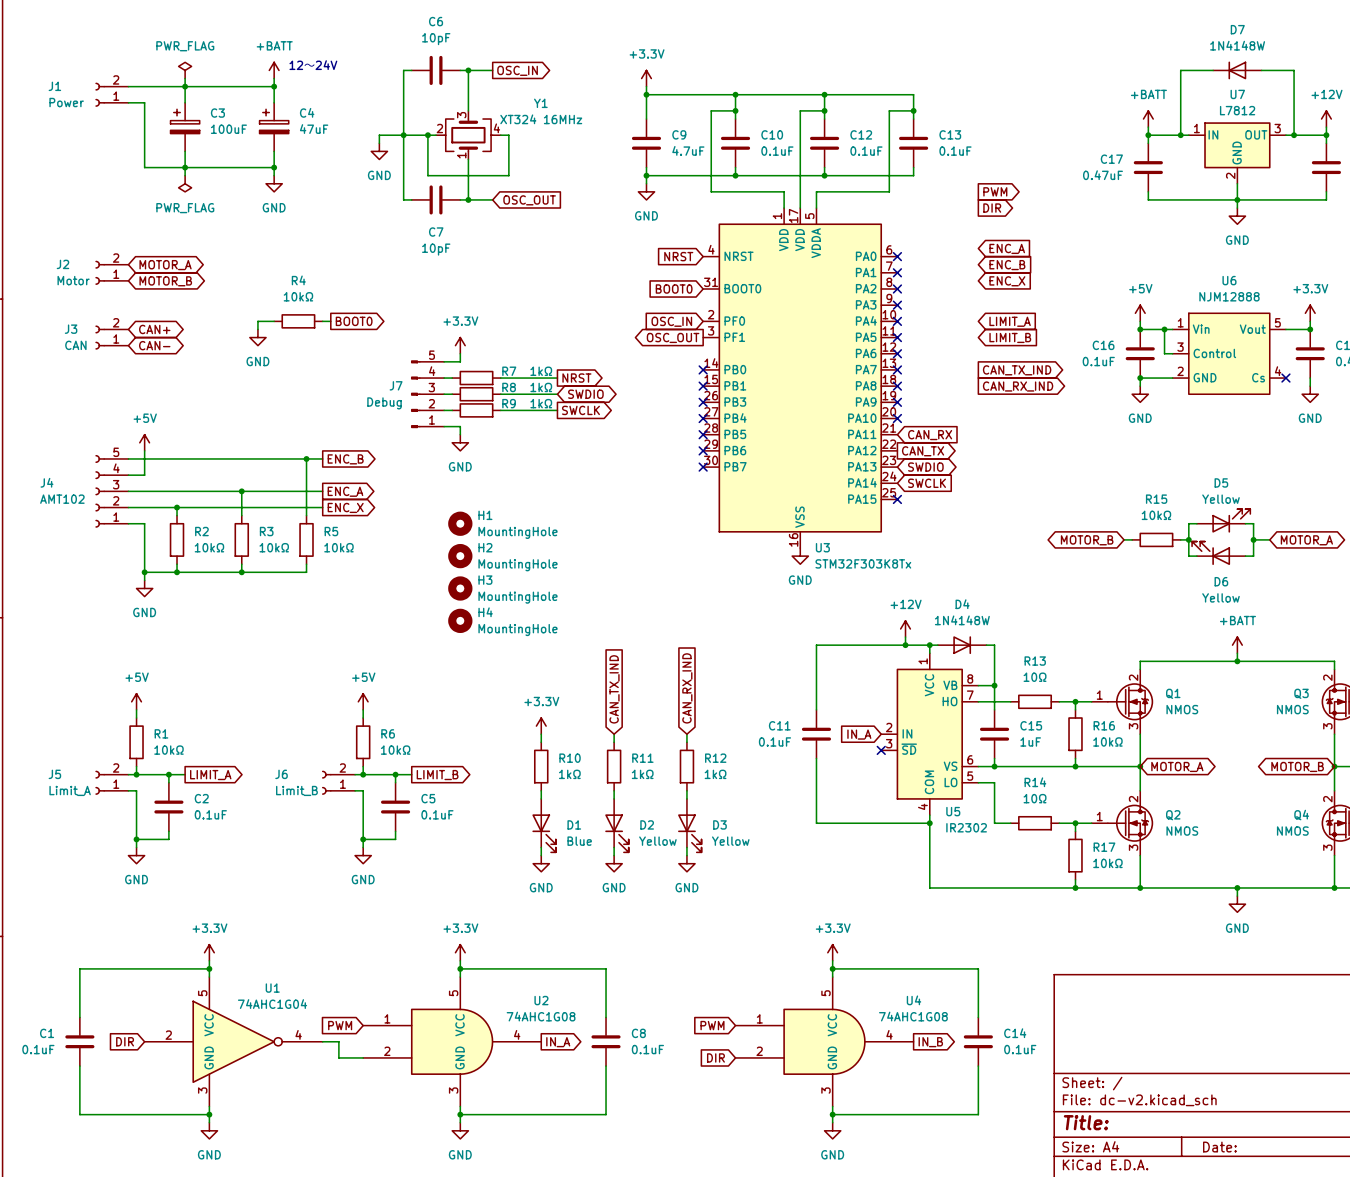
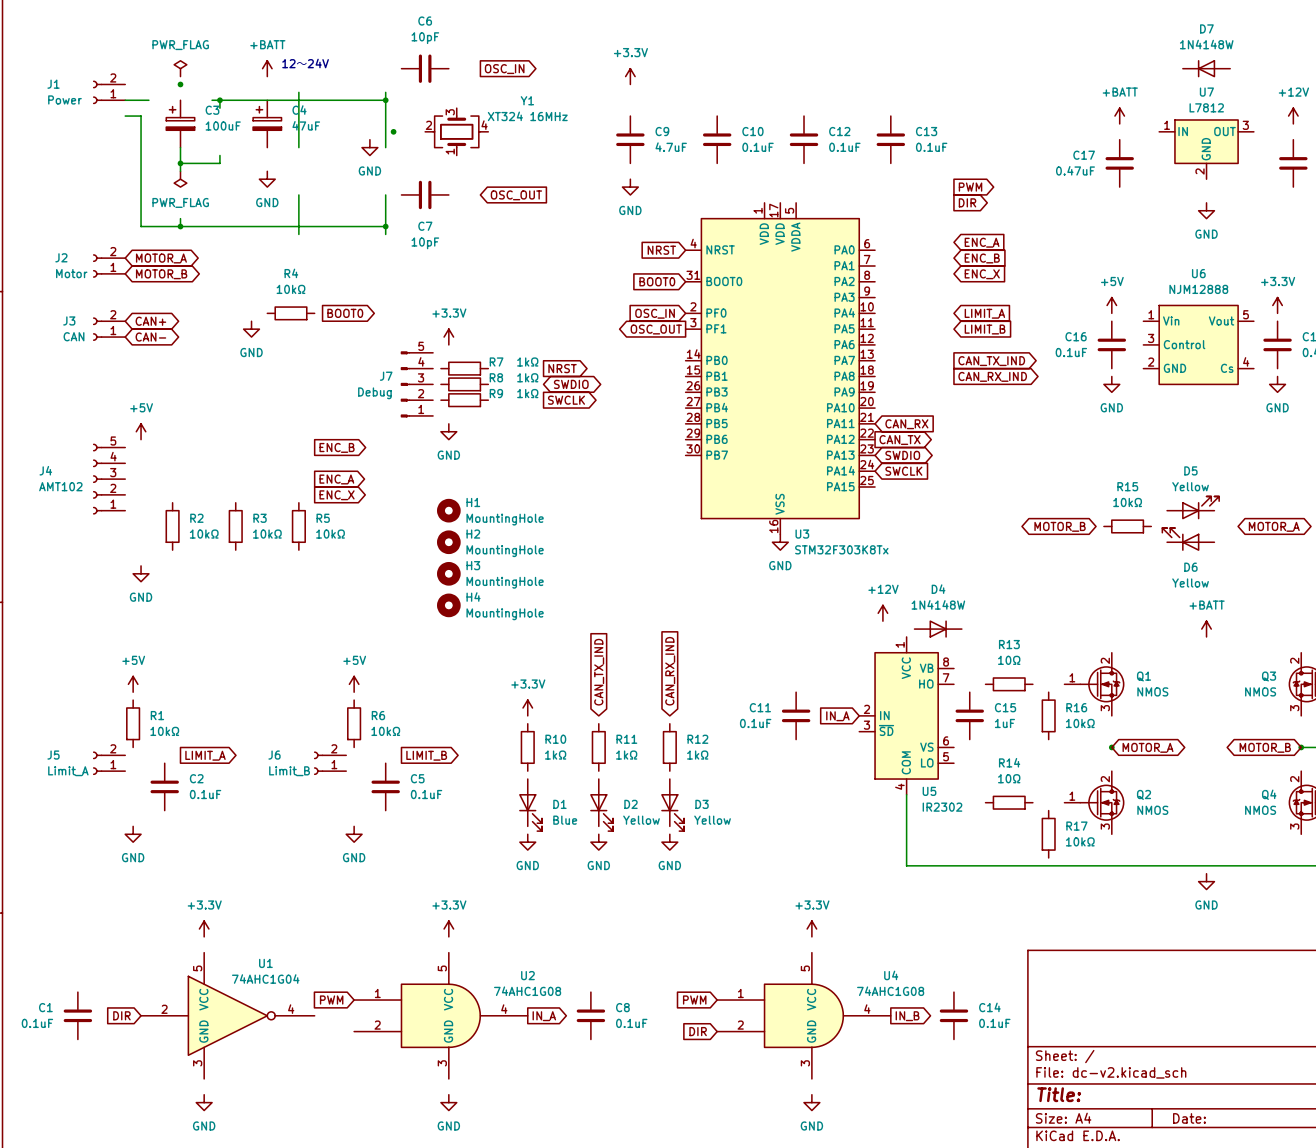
wire: (411, 70) (403, 70) (403, 199) (411, 199) -> none
wire: (460, 70) (492, 70) -> none
wire: (468, 70) (468, 110) -> none
junction: (468, 70) -> none
wire: (1213, 70) (1180, 70) (1180, 135) -> none
wire: (1261, 70) (1294, 70) (1294, 135) -> none
wire: (185, 78) (185, 102) -> none
wire: (274, 78) (274, 102) -> none
wire: (128, 86) (274, 86) -> none
junction: (274, 86) -> none
wire: (646, 86) (646, 119) -> none
wire: none -> (298, 92) (298, 147)
wire: none -> (385, 92) (385, 147)
wire: (646, 94) (913, 94) (913, 119) -> none
junction: (646, 94) -> none
wire: (735, 94) (735, 119) -> none
junction: (735, 94) -> none
wire: (824, 94) (824, 119) -> none
junction: (824, 94) -> none
wire: (144, 102) (144, 119) -> (141, 100) (148, 100)
wire: none -> (212, 100) (385, 100)
wire: none -> (219, 100) (219, 108)
junction: none -> (219, 100)
junction: none -> (385, 100)
wire: (735, 110) (711, 110) (711, 191) (784, 191) (784, 208) -> none
junction: (735, 110) -> none
wire: (824, 110) (800, 110) (800, 208) -> none
junction: (824, 110) -> none
wire: (913, 110) (889, 110) (889, 191) (816, 191) (816, 208) -> none
junction: (913, 110) -> none
wire: none -> (125, 116) (141, 116)
wire: (1148, 127) (1148, 143) -> none
wire: (1326, 127) (1326, 143) -> none
wire: (427, 135) (427, 175) (508, 175) (508, 135) (500, 135) -> none
junction: (427, 135) -> none
wire: (436, 135) (379, 135) (379, 143) -> none
wire: (1148, 135) (1188, 135) -> none
junction: (1148, 135) -> none
junction: (1180, 135) -> none
wire: (1285, 135) (1326, 135) -> none
junction: (1294, 135) -> none
junction: (1326, 135) -> none
wire: (274, 151) (274, 175) -> none
wire: (468, 159) (468, 199) -> (385, 194) (385, 234)
wire: (144, 167) (185, 167) -> (141, 163) (141, 226) (385, 226)
wire: (225, 167) (274, 167) -> (219, 163) (219, 155)
junction: (274, 167) -> none
wire: (646, 167) (646, 183) -> none
wire: (735, 167) (735, 175) -> none
wire: (824, 167) (824, 175) -> none
wire: (913, 167) (913, 175) (646, 175) -> none
junction: (646, 175) -> none
junction: (735, 175) -> none
junction: (824, 175) -> none
wire: (1237, 183) (1237, 208) -> none
wire: (1148, 191) (1148, 199) (1326, 199) (1326, 191) -> none
wire: none -> (298, 194) (298, 234)
wire: (460, 199) (492, 199) -> none
junction: (468, 199) -> none
junction: (1237, 199) -> none
wire: none -> (180, 218) (180, 226)
junction: none -> (180, 226)
junction: none -> (385, 226)
no-connect mark: (897, 256) -> none
no-connect mark: (897, 272) -> none
no-connect mark: (897, 289) -> none
no-connect mark: (897, 305) -> none
wire: (274, 321) (257, 321) (257, 329) -> none
wire: (322, 321) (330, 321) -> none
no-connect mark: (897, 321) -> none
wire: (1140, 321) (1140, 329) (1172, 329) -> none
wire: (1310, 321) (1310, 329) (1285, 329) -> none
junction: (1140, 329) -> none
wire: (1164, 329) (1164, 353) (1172, 353) -> none
junction: (1164, 329) -> none
junction: (1310, 329) -> none
no-connect mark: (897, 337) -> none
wire: (460, 353) (460, 361) (444, 361) -> none
no-connect mark: (897, 353) -> none
no-connect mark: (703, 369) -> none
no-connect mark: (897, 369) -> none
wire: (444, 378) (452, 378) -> none
wire: (500, 378) (557, 378) -> none
junction: (1140, 378) -> none
wire: (1172, 378) (1140, 378) (1140, 386) -> none
no-connect mark: (1285, 378) -> none
wire: (1310, 378) (1310, 386) -> none
no-connect mark: (703, 386) -> none
no-connect mark: (897, 386) -> none
wire: (444, 394) (452, 394) -> none
wire: (500, 394) (557, 394) -> none
no-connect mark: (703, 402) -> none
no-connect mark: (897, 402) -> none
wire: (444, 410) (452, 410) -> none
wire: (500, 410) (557, 410) -> none
no-connect mark: (703, 418) -> none
no-connect mark: (897, 418) -> none
wire: (444, 426) (460, 426) (460, 434) -> none
no-connect mark: (703, 434) -> none
wire: (144, 450) (144, 475) (128, 475) -> none
no-connect mark: (703, 450) -> none
wire: (128, 458) (322, 458) -> none
wire: (306, 458) (306, 515) -> none
junction: (306, 458) -> none
no-connect mark: (703, 467) -> none
wire: (128, 491) (322, 491) -> none
wire: (241, 491) (241, 515) -> none
junction: (241, 491) -> none
no-connect mark: (897, 499) -> none
wire: (128, 507) (322, 507) -> none
wire: (177, 507) (177, 515) -> none
junction: (177, 507) -> none
wire: (128, 523) (144, 523) (144, 580) -> none
wire: (1196, 523) (1188, 523) (1188, 556) (1196, 556) -> none
wire: (1245, 523) (1253, 523) (1253, 556) (1245, 556) -> none
wire: (1124, 539) (1132, 539) -> none
wire: (1180, 539) (1188, 539) -> none
junction: (1188, 539) -> none
wire: (1253, 539) (1269, 539) -> none
junction: (1253, 539) -> none
wire: (177, 564) (177, 572) -> none
wire: (241, 564) (241, 572) -> none
wire: (306, 564) (306, 572) (144, 572) -> none
junction: (144, 572) -> none
junction: (177, 572) -> none
junction: (241, 572) -> none
wire: (905, 637) (905, 645) -> none
junction: (905, 645) -> none
wire: (929, 645) (929, 653) -> none
junction: (929, 645) -> none
wire: (937, 645) (816, 645) (816, 709) -> none
wire: (986, 645) (994, 645) (994, 709) -> none
wire: (1237, 653) (1237, 661) -> none
junction: (1237, 661) -> none
wire: (1140, 669) (1140, 661) (1334, 661) (1334, 669) -> none
wire: (978, 685) (994, 685) -> none
junction: (994, 685) -> none
wire: (978, 701) (1010, 701) -> none
wire: (1059, 701) (1091, 701) -> none
wire: (1075, 701) (1075, 709) -> none
junction: (1075, 701) -> none
wire: (136, 709) (136, 718) -> none
wire: (363, 709) (363, 718) -> none
wire: (541, 734) (541, 742) -> none
wire: (614, 734) (614, 742) -> none
wire: (686, 734) (686, 742) -> none
wire: (1140, 734) (1140, 790) -> none
wire: (1334, 734) (1334, 790) -> none
no-connect mark: (881, 750) -> none
wire: (816, 758) (816, 823) (929, 823) -> none
wire: (994, 758) (994, 766) -> none
wire: (1075, 758) (1075, 766) -> none
wire: (136, 766) (136, 774) -> none
wire: (363, 766) (363, 774) -> none
wire: (978, 766) (1140, 766) -> none
junction: (994, 766) -> none
junction: (1075, 766) -> none
wire: (128, 774) (185, 774) -> none
junction: (136, 774) -> none
wire: (168, 774) (168, 782) -> none
junction: (168, 774) -> none
wire: (355, 774) (411, 774) -> none
junction: (363, 774) -> none
wire: (395, 774) (395, 782) -> none
junction: (395, 774) -> none
wire: (978, 782) (994, 782) (994, 823) (1010, 823) -> none
wire: (128, 790) (136, 790) (136, 847) -> none
wire: (355, 790) (363, 790) (363, 847) -> none
wire: (541, 790) (541, 798) -> none
wire: (614, 790) (614, 798) -> none
wire: (686, 790) (686, 798) -> none
junction: (929, 823) -> none
wire: (1059, 823) (1091, 823) -> none
wire: (1075, 823) (1075, 831) -> none
junction: (1075, 823) -> none
wire: (168, 831) (168, 839) (136, 839) -> none
wire: (395, 831) (395, 839) (363, 839) -> none
junction: (136, 839) -> none
junction: (363, 839) -> none
wire: (541, 847) (541, 855) -> none
wire: (614, 847) (614, 855) -> none
wire: (686, 847) (686, 855) -> none
wire: (1140, 855) (1140, 887) -> none
wire: (1334, 855) (1334, 887) -> none
wire: (1075, 879) (1075, 887) -> none
junction: (1075, 887) -> none
junction: (1140, 887) -> none
wire: (1237, 887) (1237, 896) -> none
junction: (1237, 887) -> none
junction: (1334, 887) -> none
wire: (209, 960) (209, 977) -> none
wire: (460, 960) (460, 977) -> none
wire: (832, 960) (832, 977) -> none
wire: (209, 968) (79, 968) (79, 1017) -> none
junction: (209, 968) -> none
wire: (460, 968) (606, 968) (606, 1017) -> none
junction: (460, 968) -> none
wire: (832, 968) (978, 968) (978, 1017) -> none
junction: (832, 968) -> none
wire: (322, 1041) (338, 1041) (338, 1057) (363, 1057) -> none
wire: (79, 1066) (79, 1114) (209, 1114) -> none
wire: (606, 1066) (606, 1114) (460, 1114) -> none
wire: (978, 1066) (978, 1114) (832, 1114) -> none
wire: (209, 1106) (209, 1122) -> none
wire: (460, 1106) (460, 1122) -> none
wire: (832, 1106) (832, 1122) -> none
junction: (209, 1114) -> none
junction: (460, 1114) -> none
junction: (832, 1114) -> none

